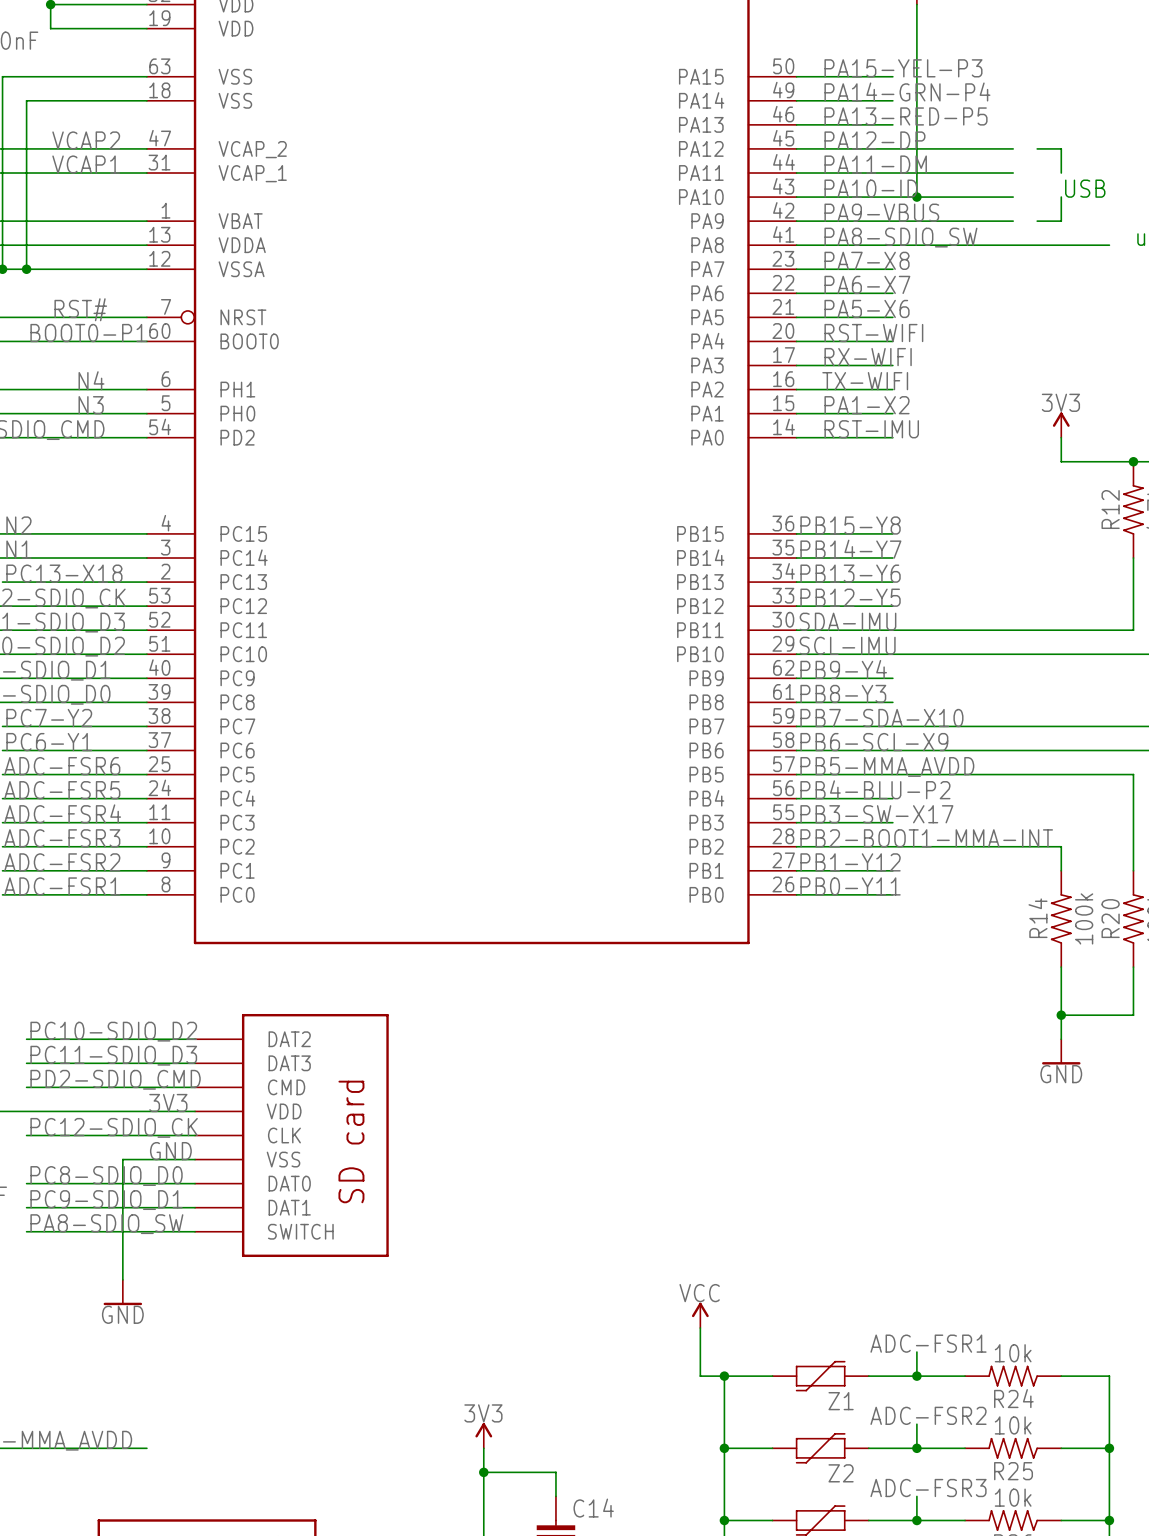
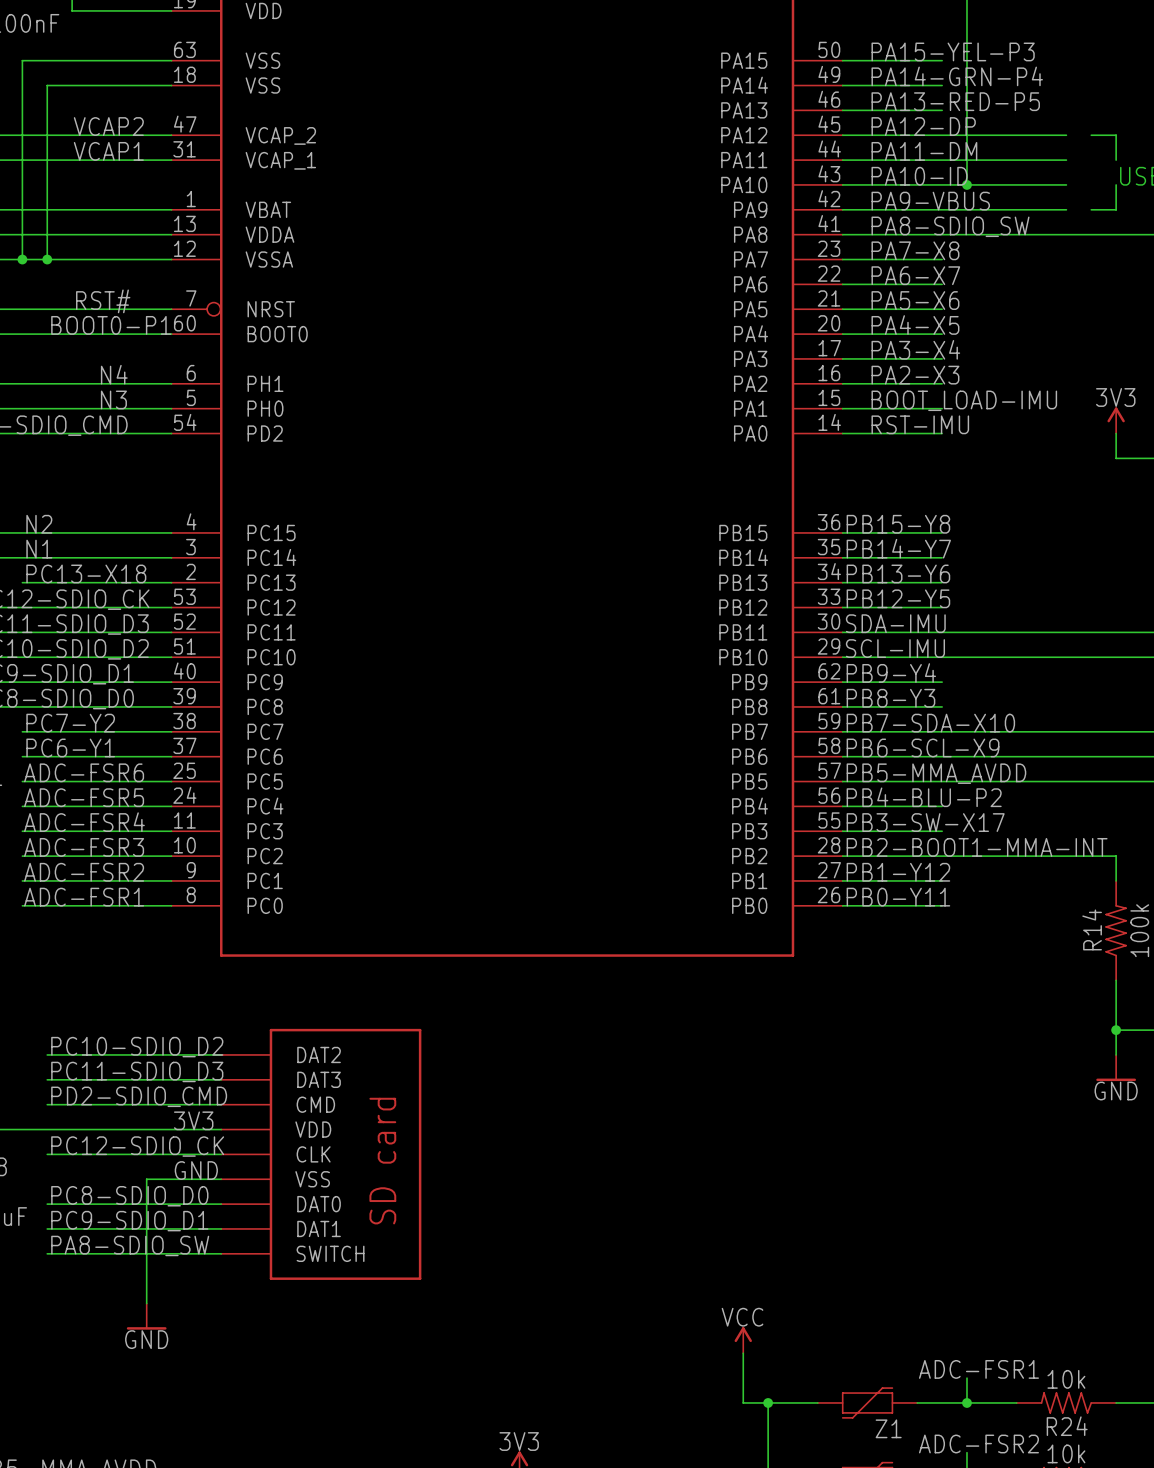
label: RST-WIFI (873, 333) -> PA4-X5 (915, 324)
label: RX-WIFI (868, 357) -> PA3-X4 (915, 349)
label: TX-WIFI (865, 381) -> PA2-X3 (915, 375)
label: PA1-X2 (867, 405) -> BOOT_LOAD-IMU (964, 400)

